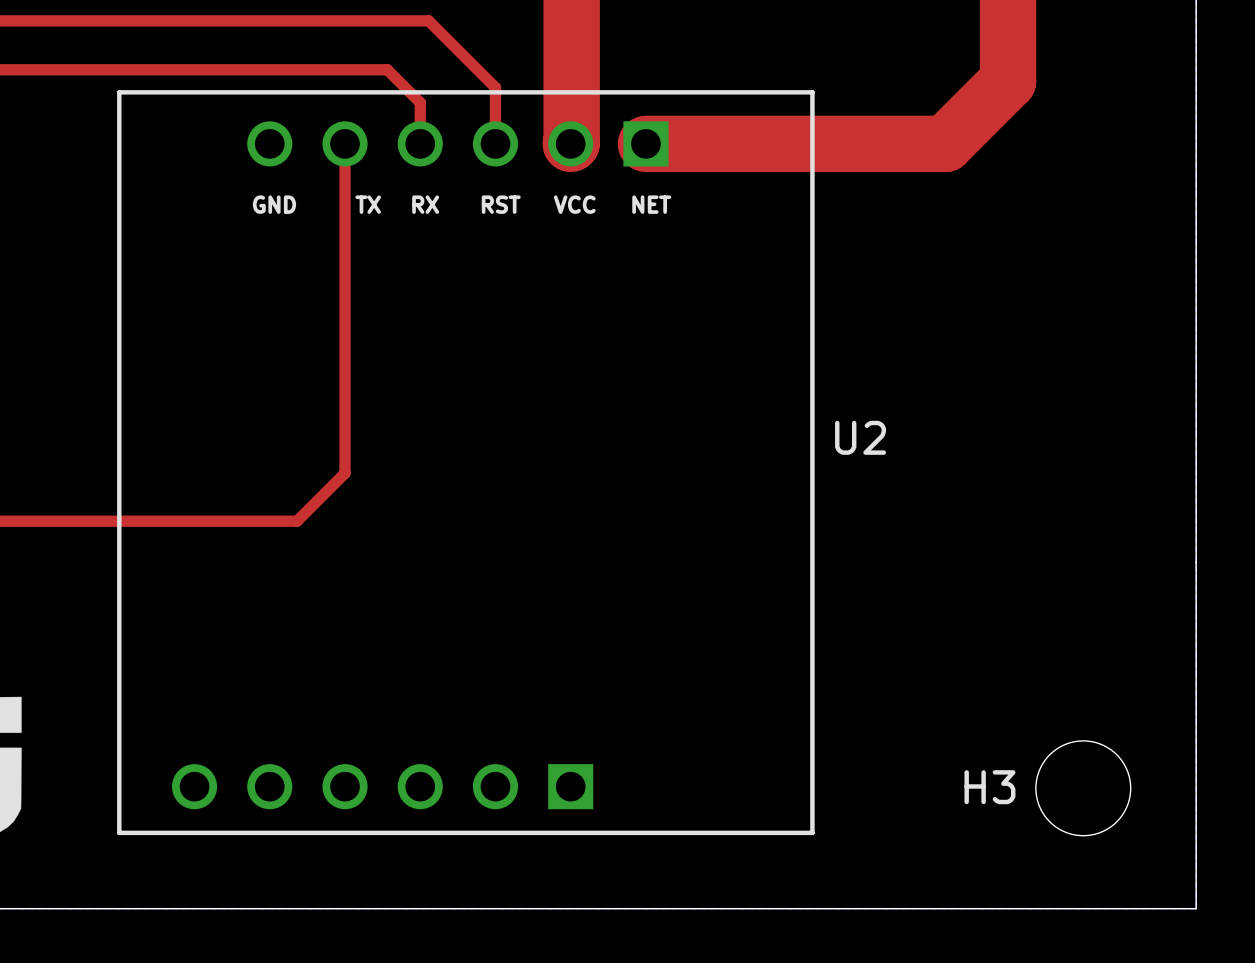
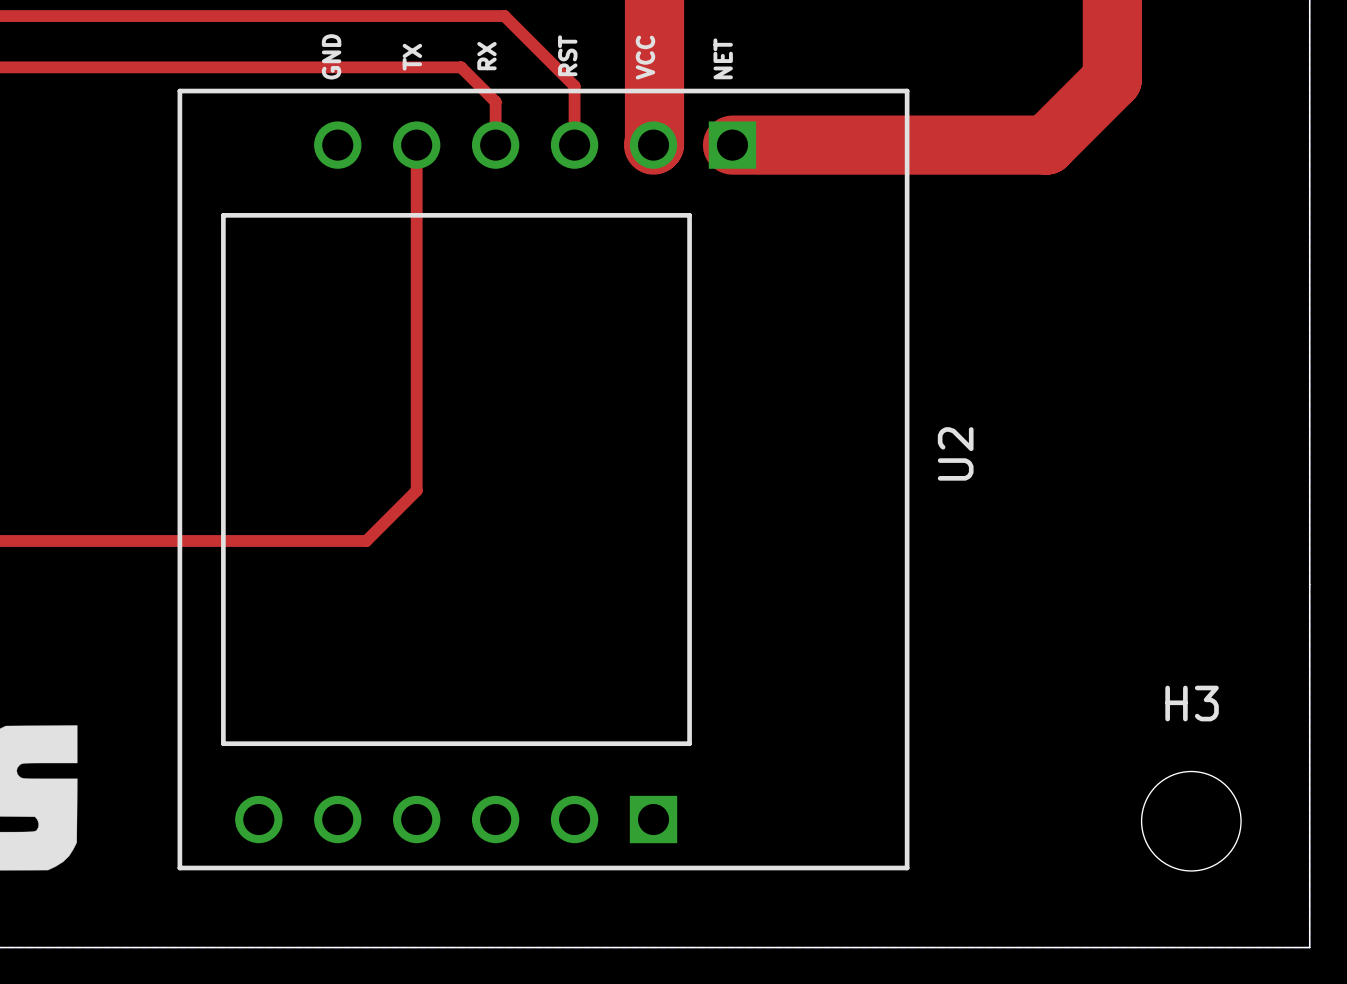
U2 footprint: [117, 90, 815, 836] -> [177, 88, 910, 871]
H3 name position: H3 (989, 787) -> H3 (1192, 703)

